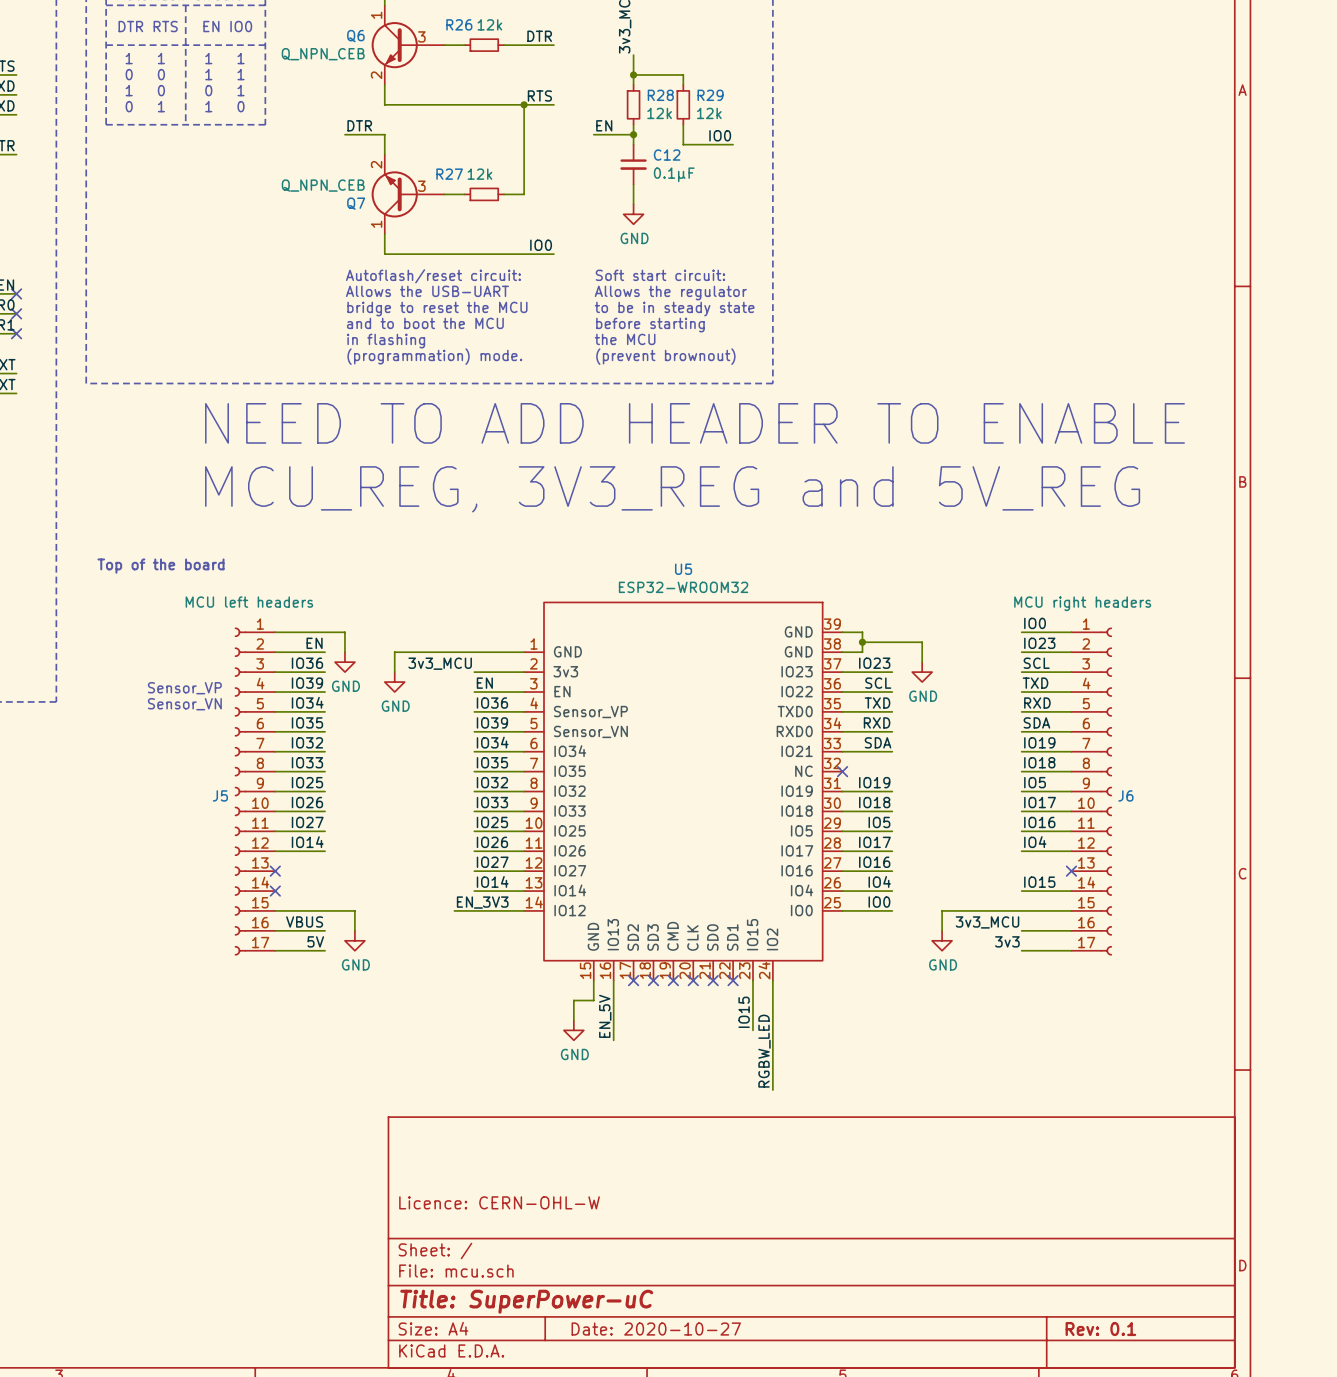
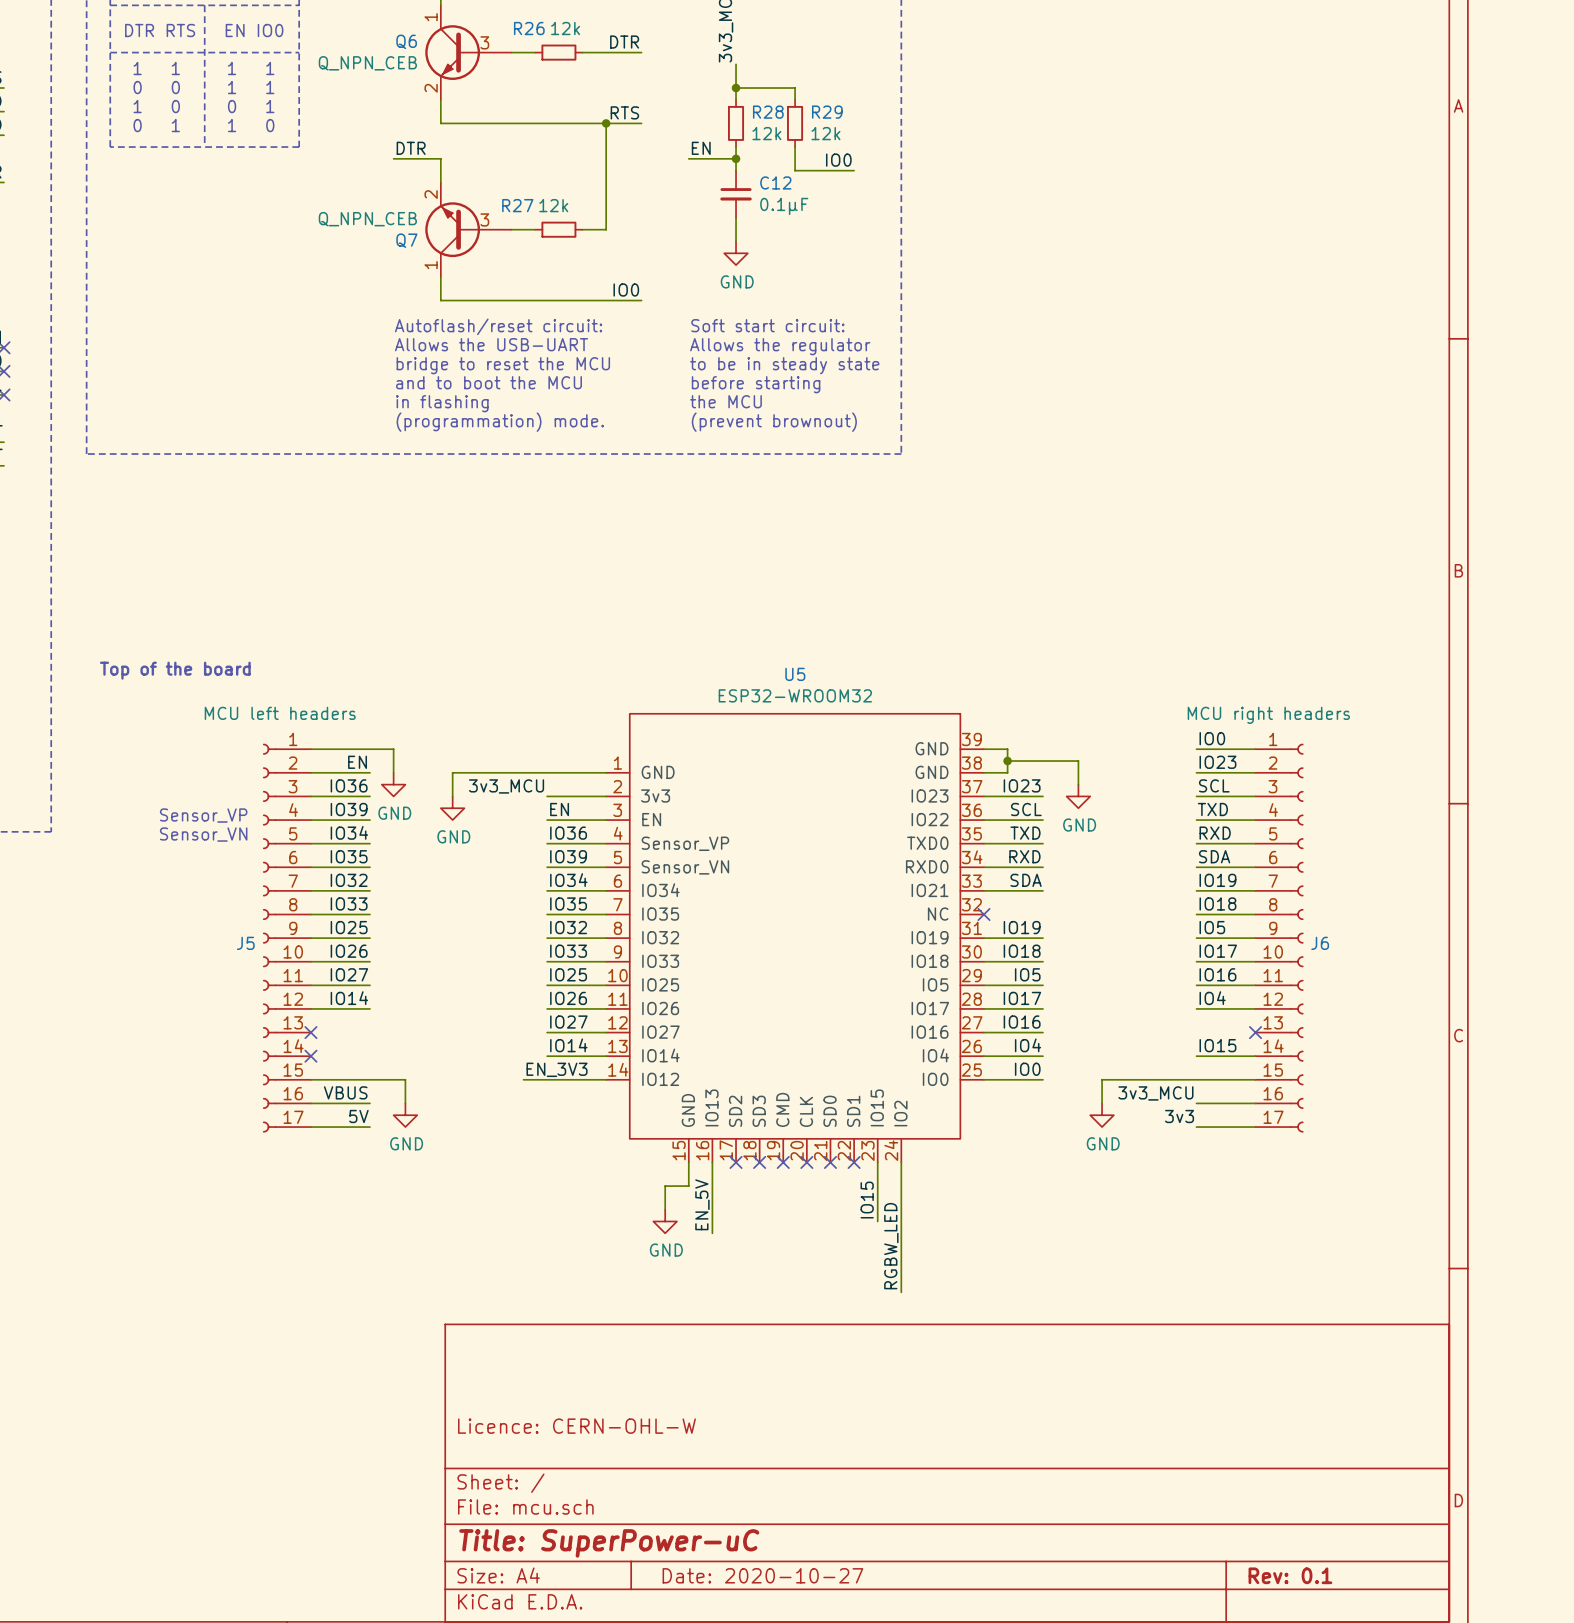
text: NEED TO ADD HEADER TO ENABLE (695, 423) -> none
text: MCU_REG, 3V3_REG and 5V_REG (672, 489) -> none

